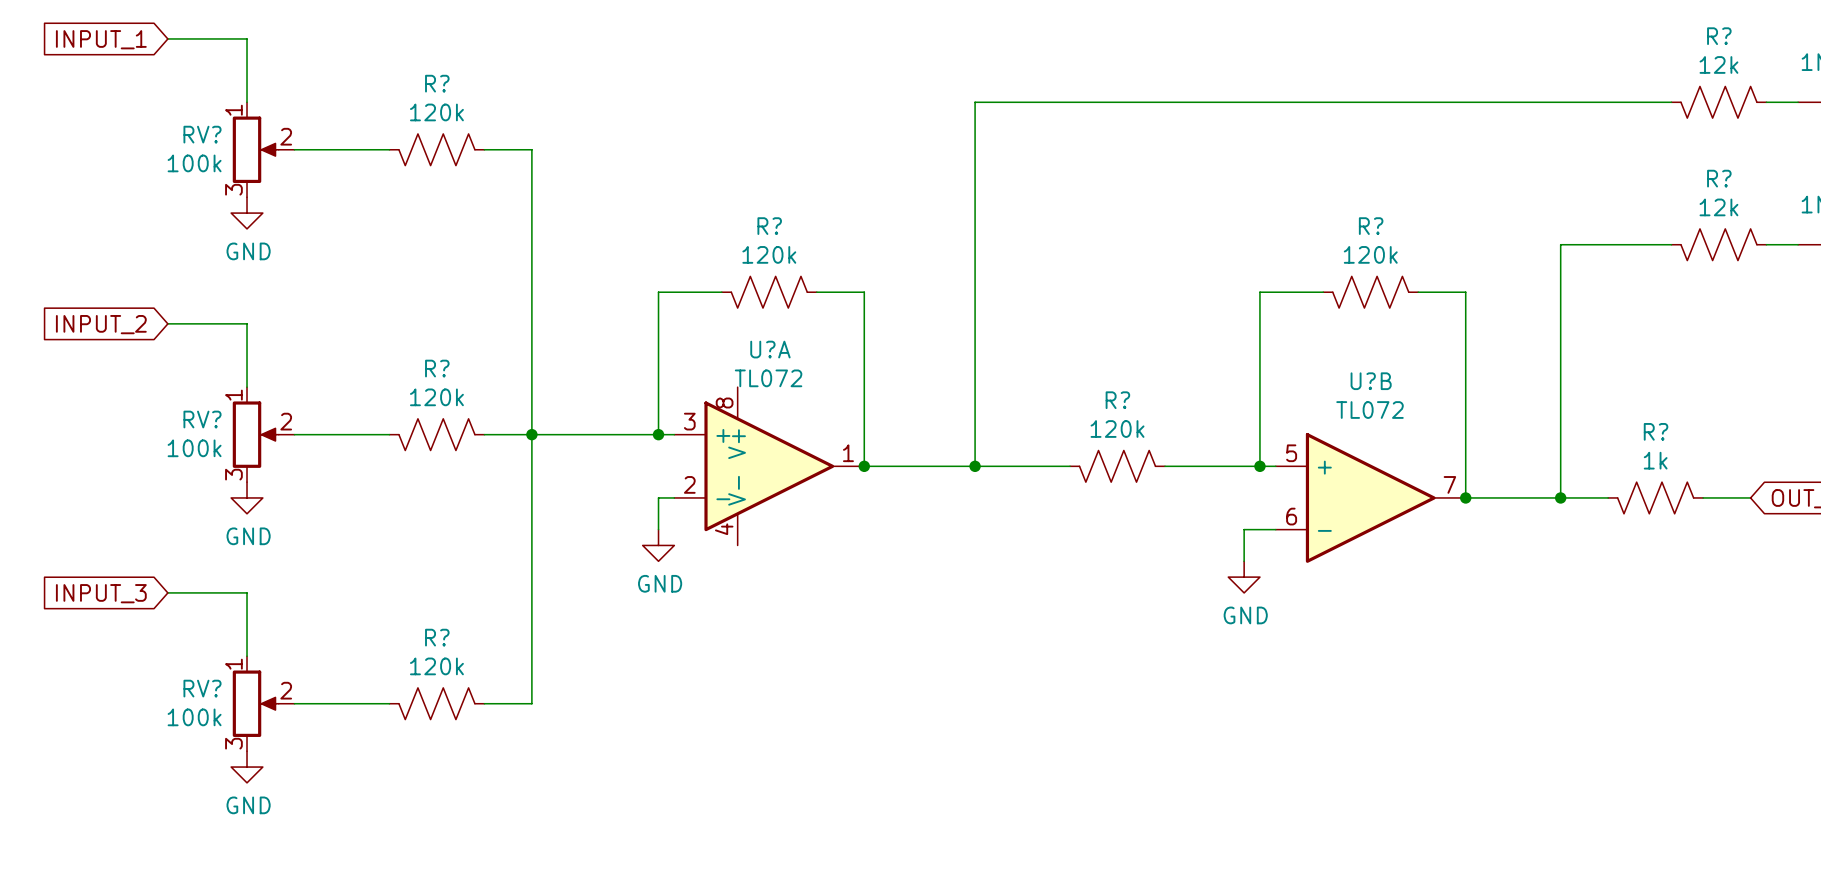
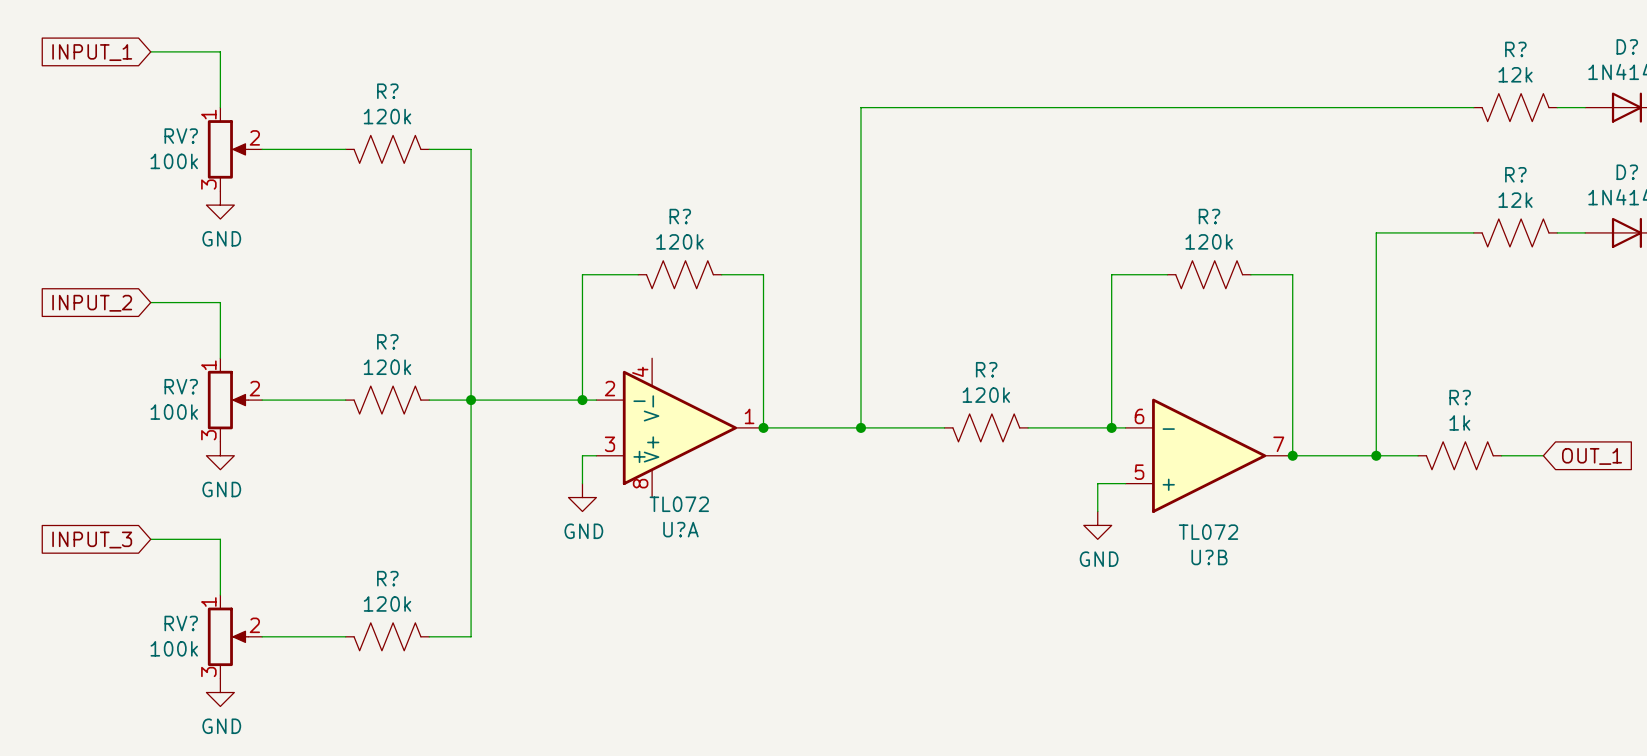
U?A flip: as is (769, 466) -> up-down (679, 427)
U?B flip: as is (1370, 497) -> up-down (1209, 455)

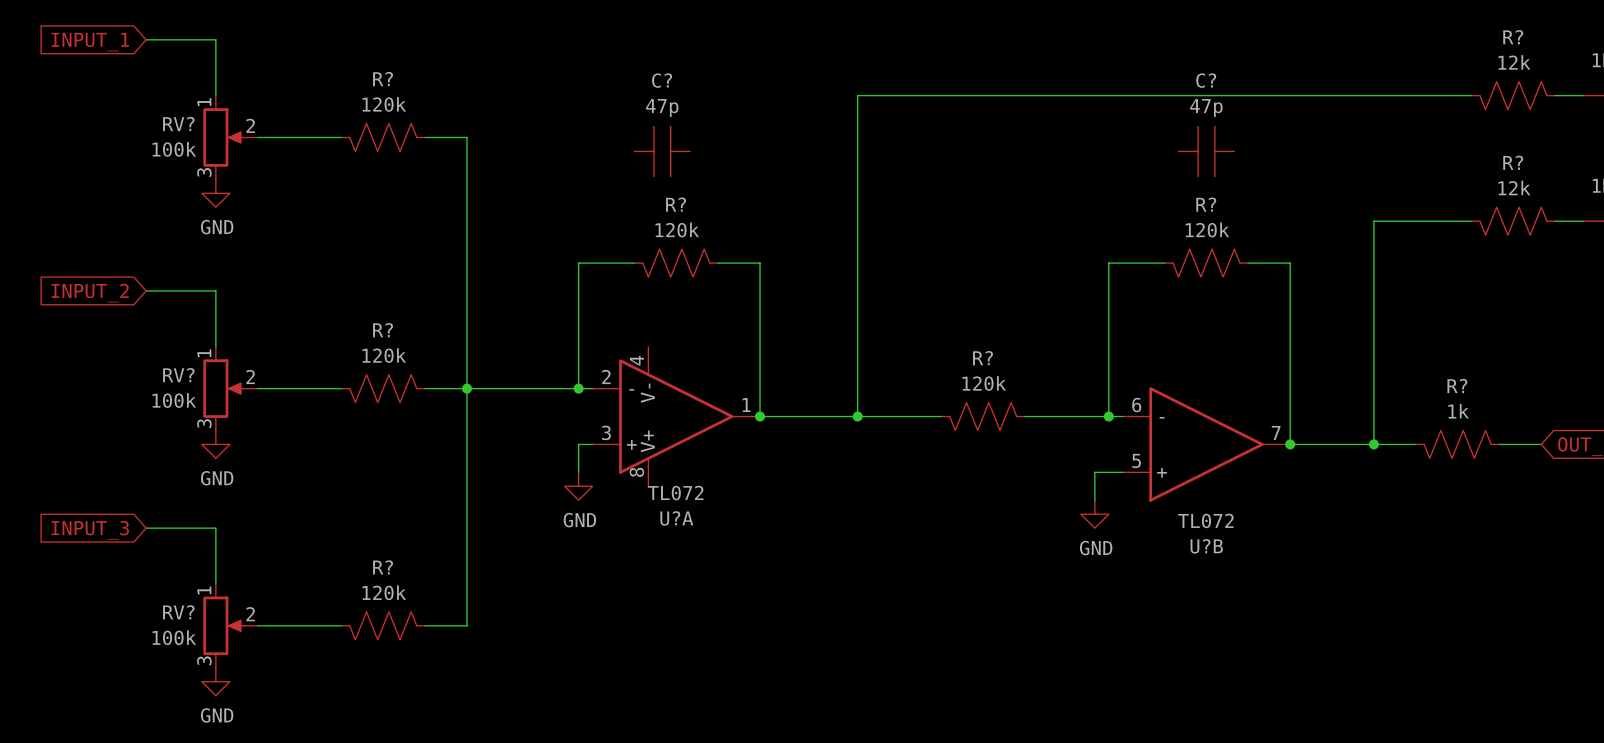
C?: none -> 47p (662, 151)
C?: none -> 47p (1206, 151)

